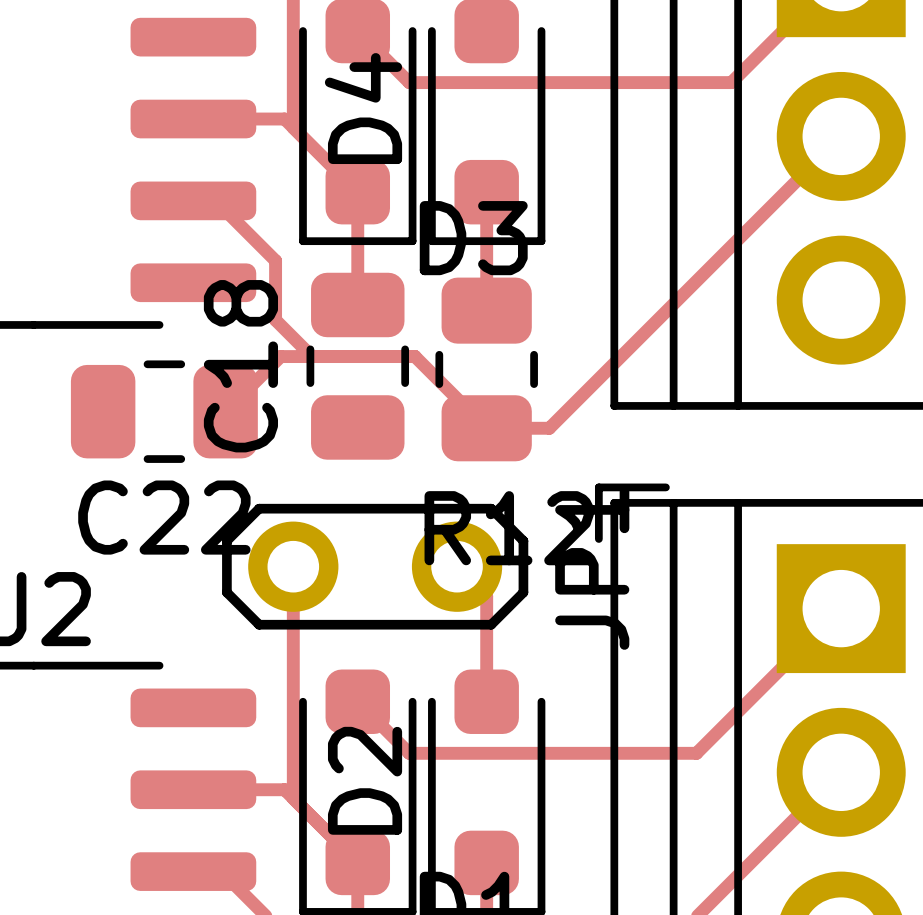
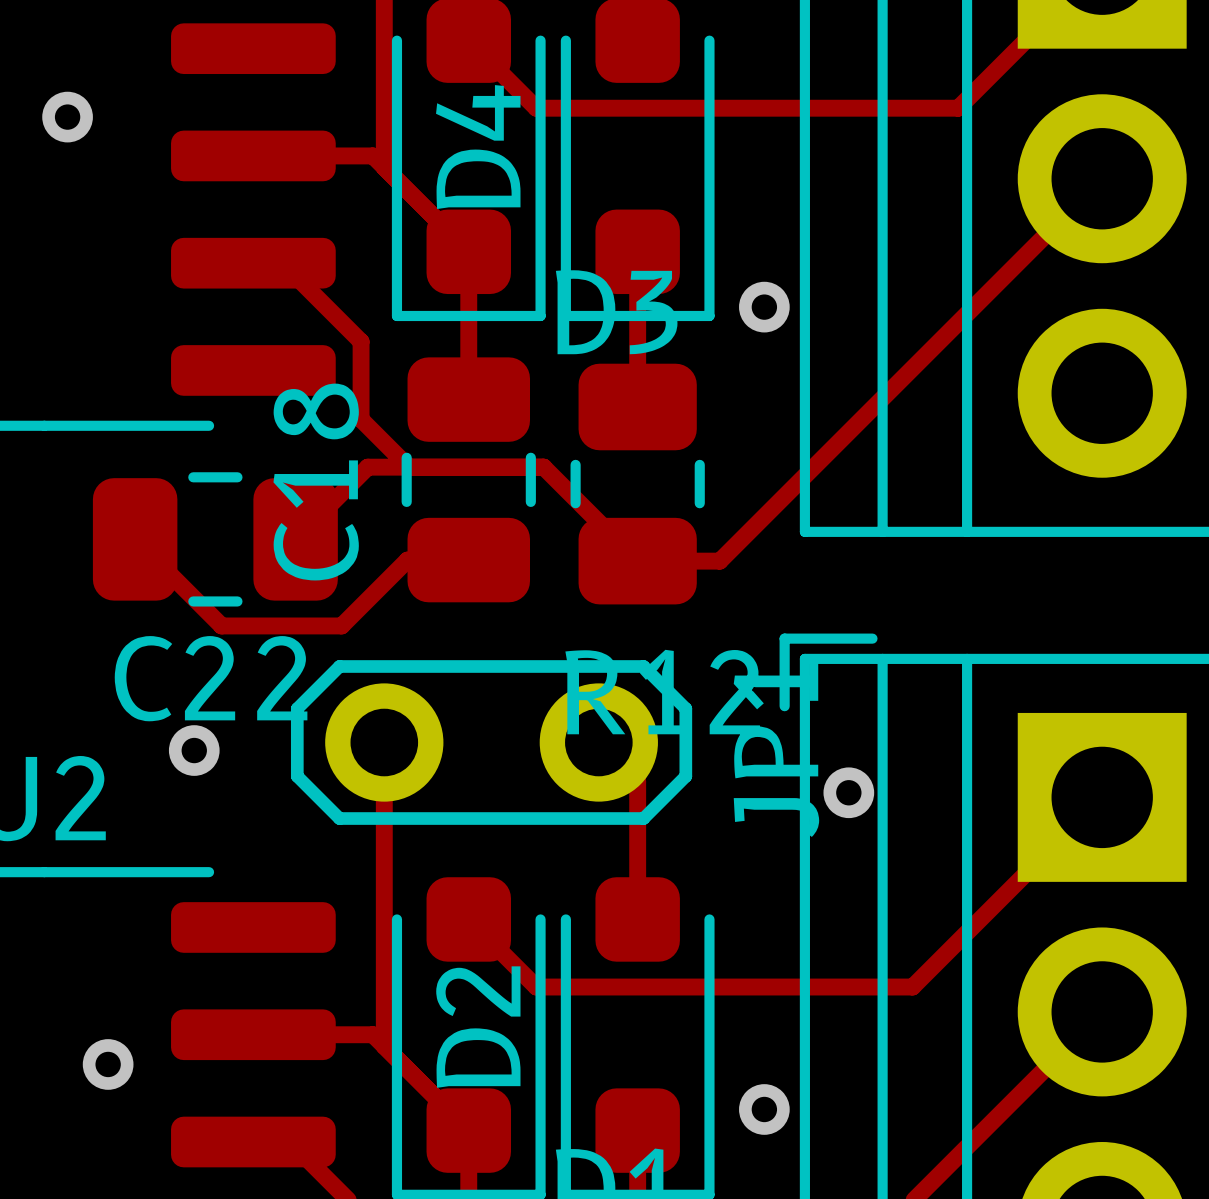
via: none -> (67, 117)
via: none -> (764, 307)
track: none -> (135, 539) (221, 625) (341, 625) (407, 560) (468, 560)
via: none -> (194, 750)
via: none -> (848, 792)
via: none -> (108, 1064)
via: none -> (764, 1109)

